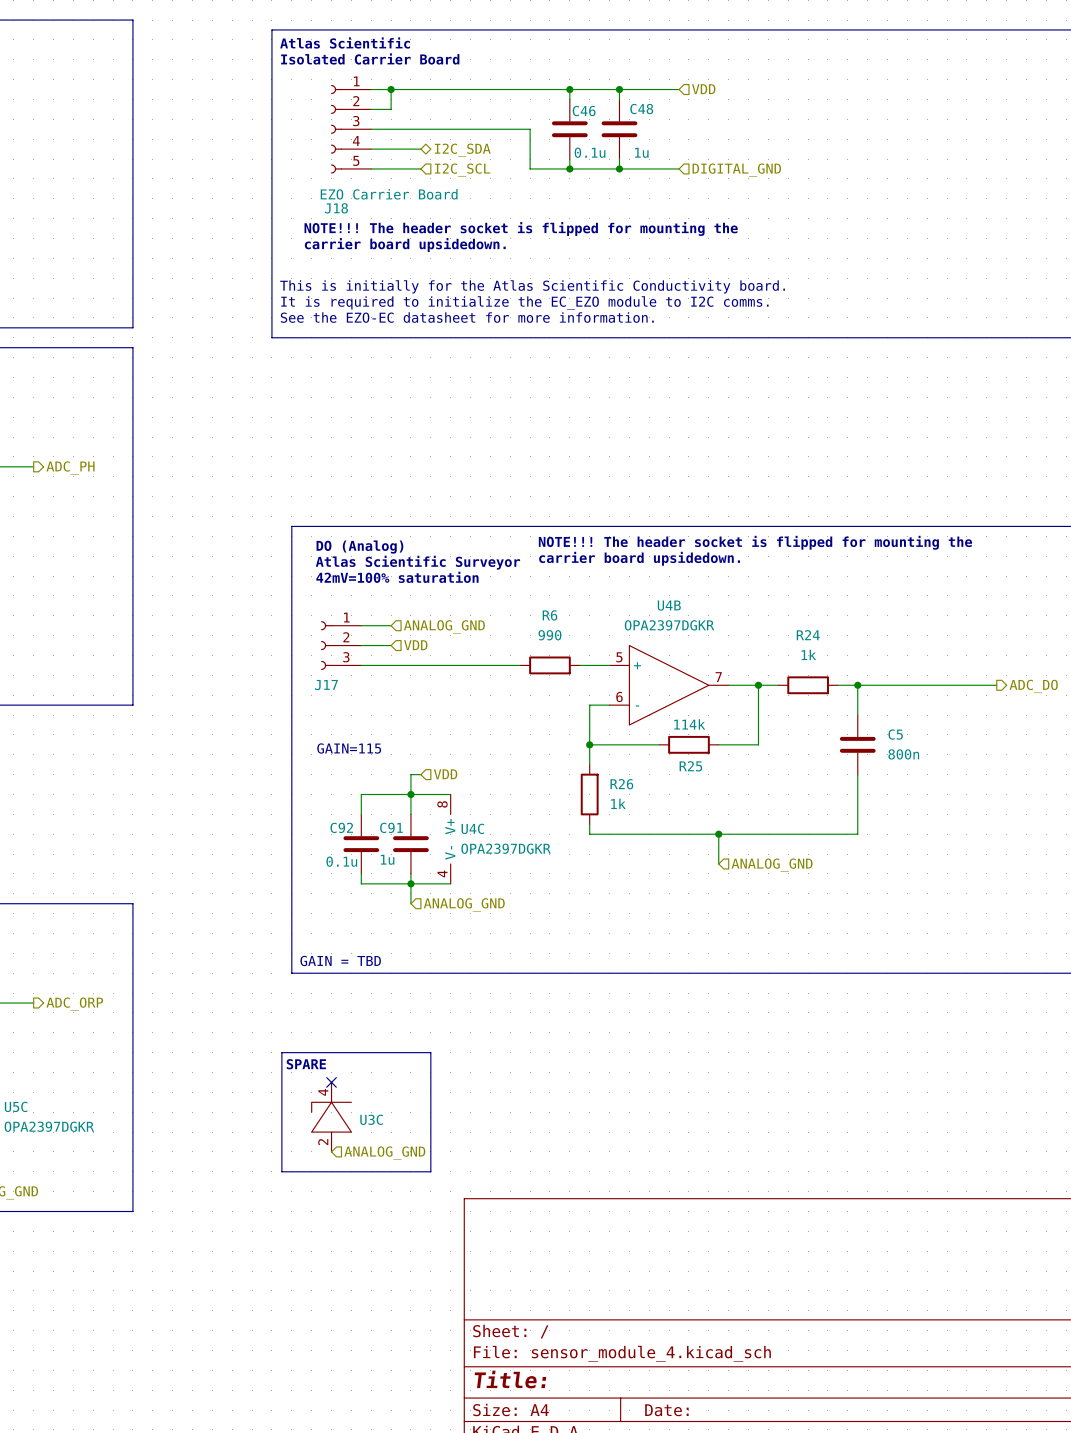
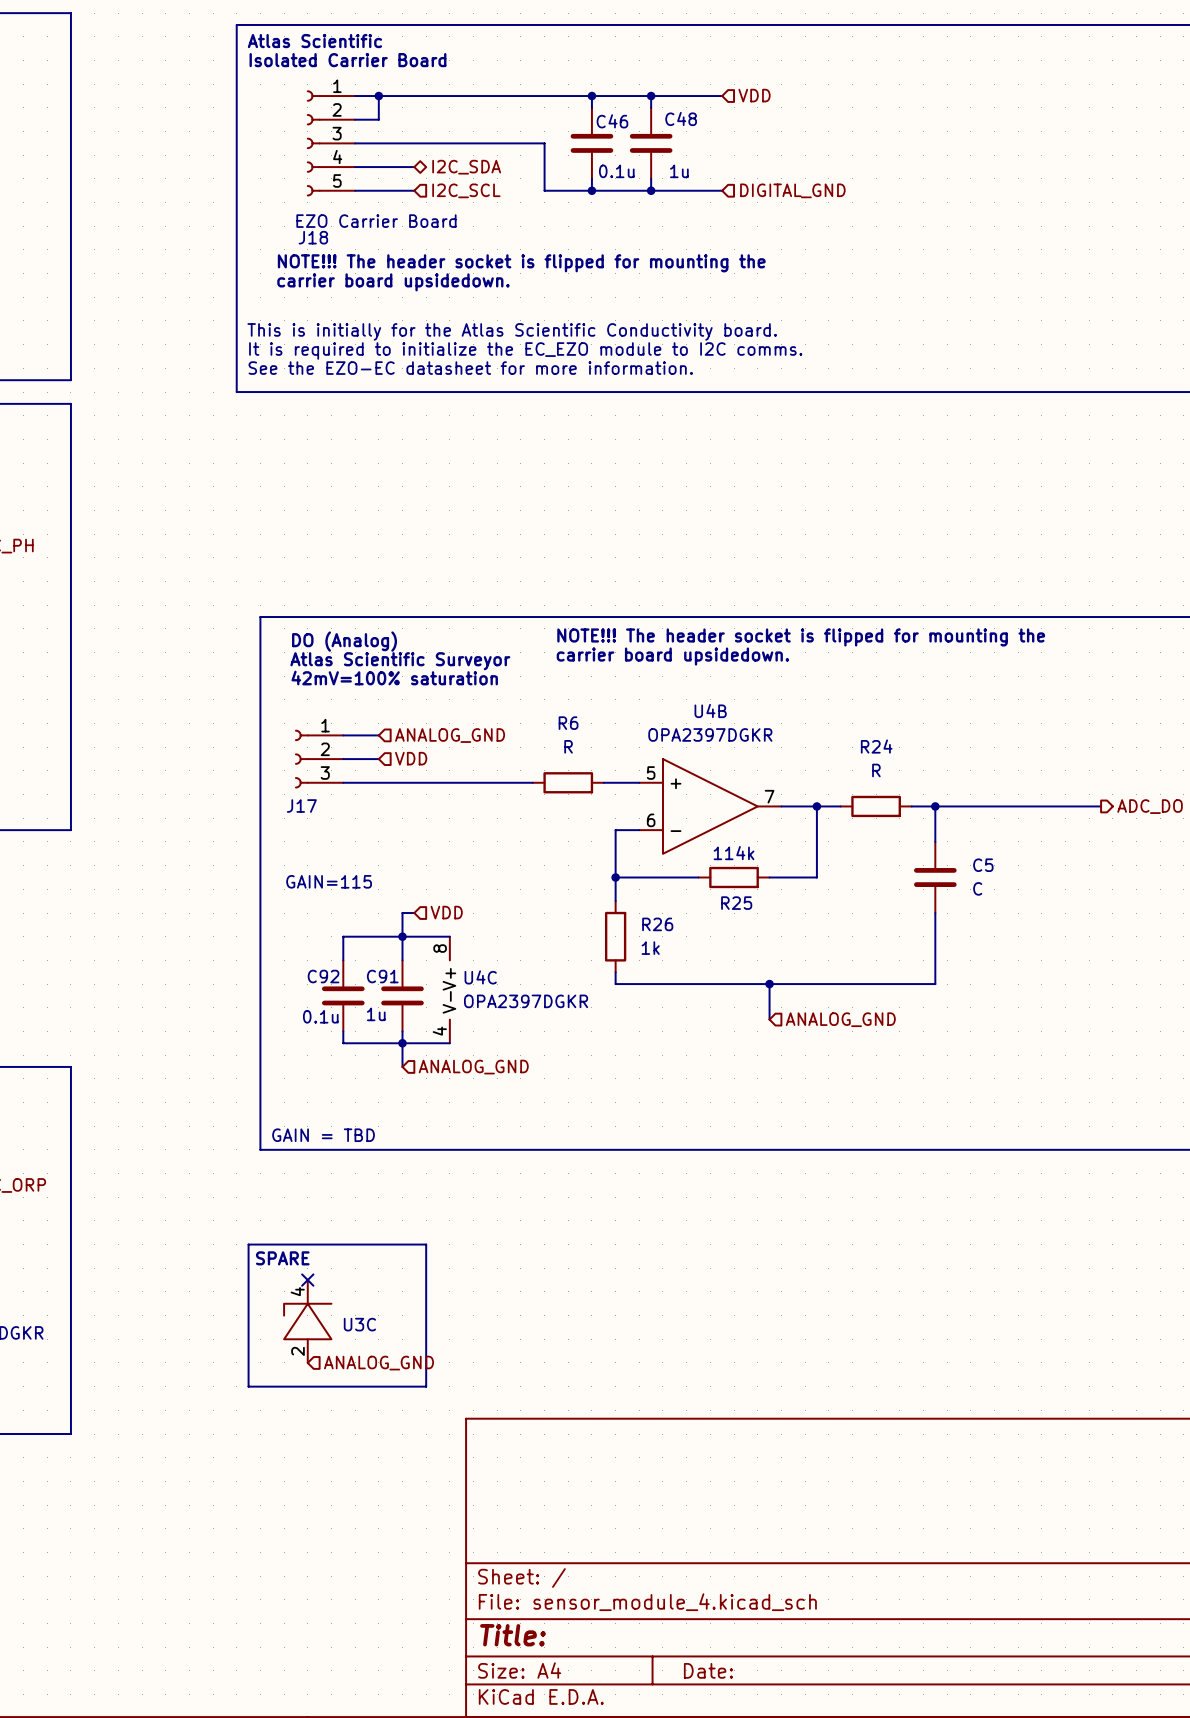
R6 value: 990 (549, 635) -> R (568, 746)
R24 value: 1k (808, 654) -> R (876, 770)
C5 value: 800n (903, 754) -> C (977, 888)

